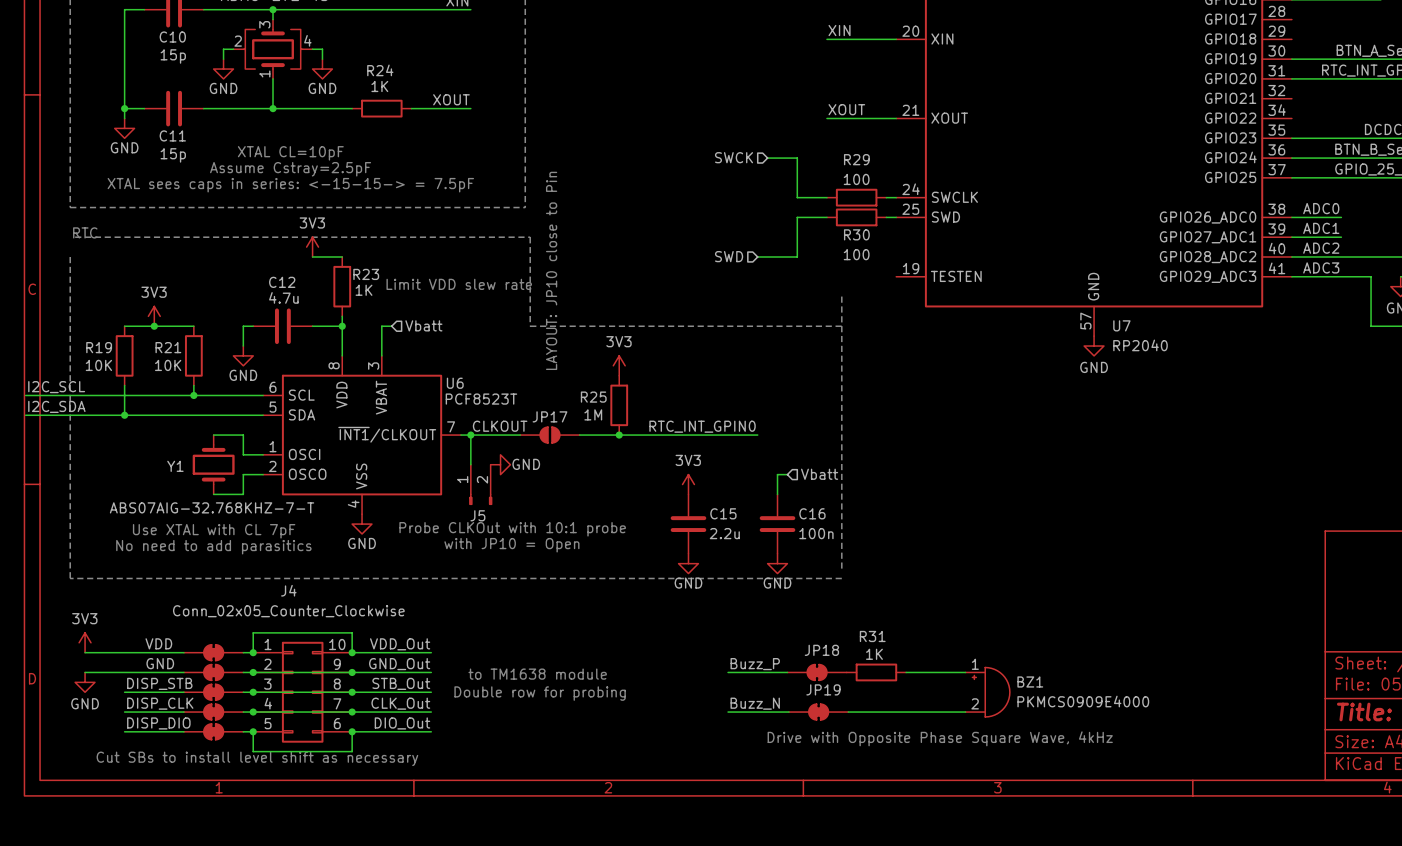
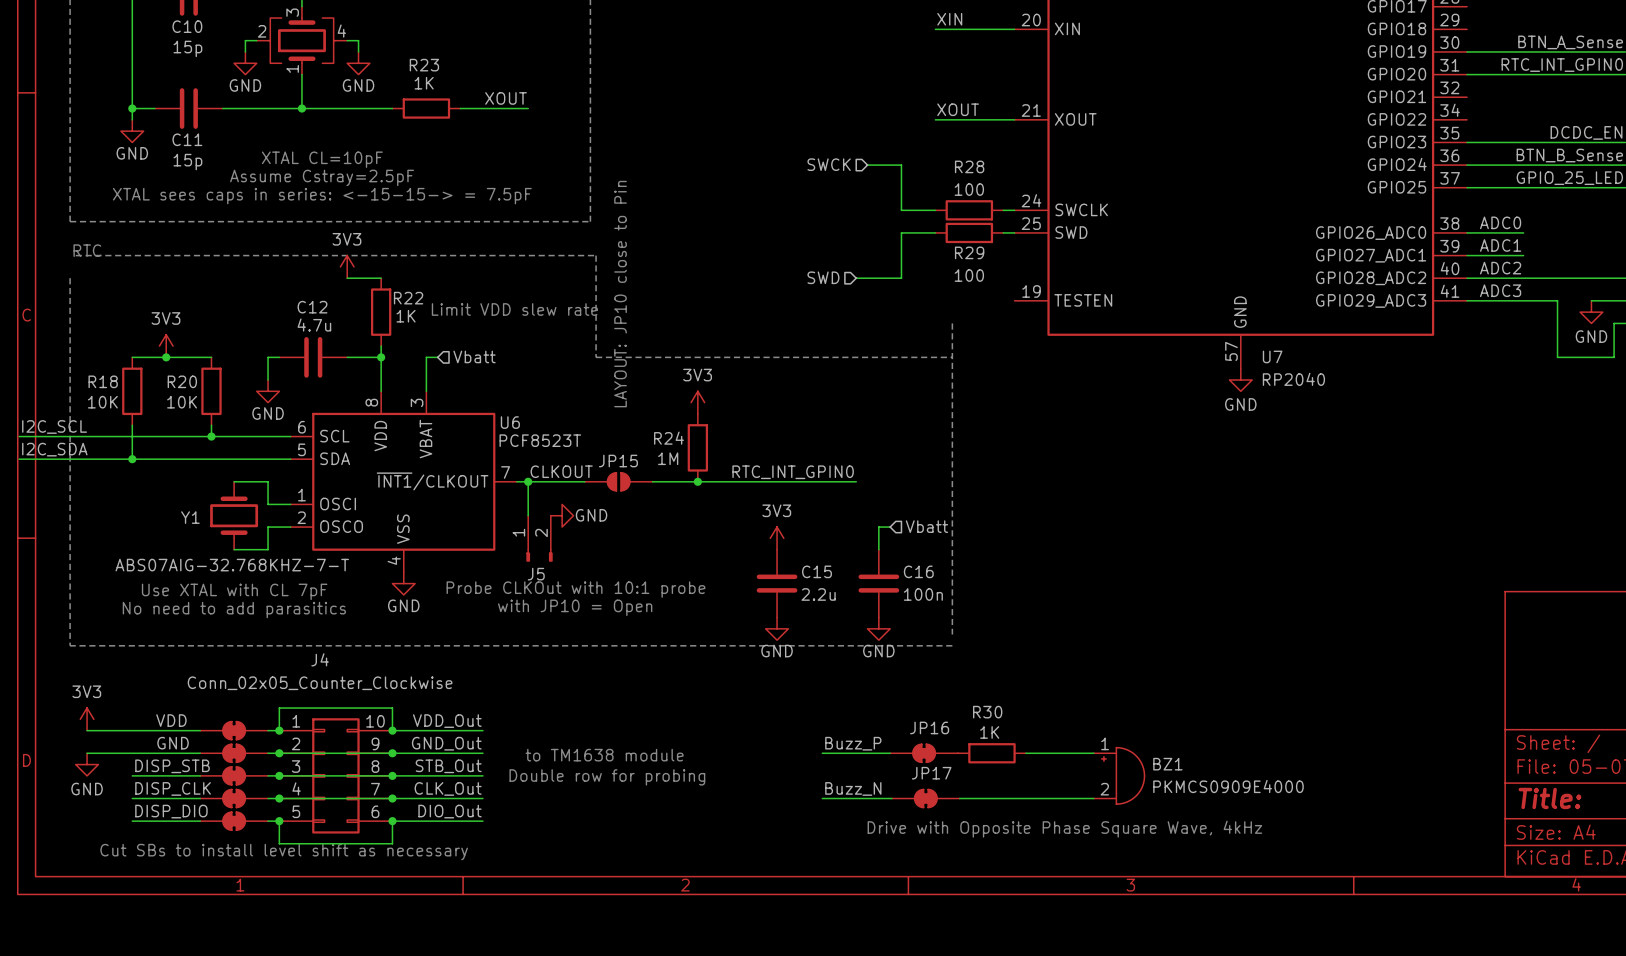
R24 name: R24 (380, 70) -> R23 (424, 65)
R29 name: R29 (856, 159) -> R28 (969, 166)
R30 name: R30 (856, 234) -> R29 (969, 252)
R23 name: R23 (366, 274) -> R22 (408, 298)
R19 name: R19 (99, 347) -> R18 (103, 381)
R21 name: R21 (168, 347) -> R20 (182, 381)
R25 name: R25 (593, 397) -> R24 (668, 438)
JP17 name: JP17 (549, 416) -> JP15 (618, 461)
R31 name: R31 (872, 636) -> R30 (987, 712)
JP18 name: JP18 (821, 650) -> JP16 (929, 727)
JP19 name: JP19 (823, 689) -> JP17 (931, 773)

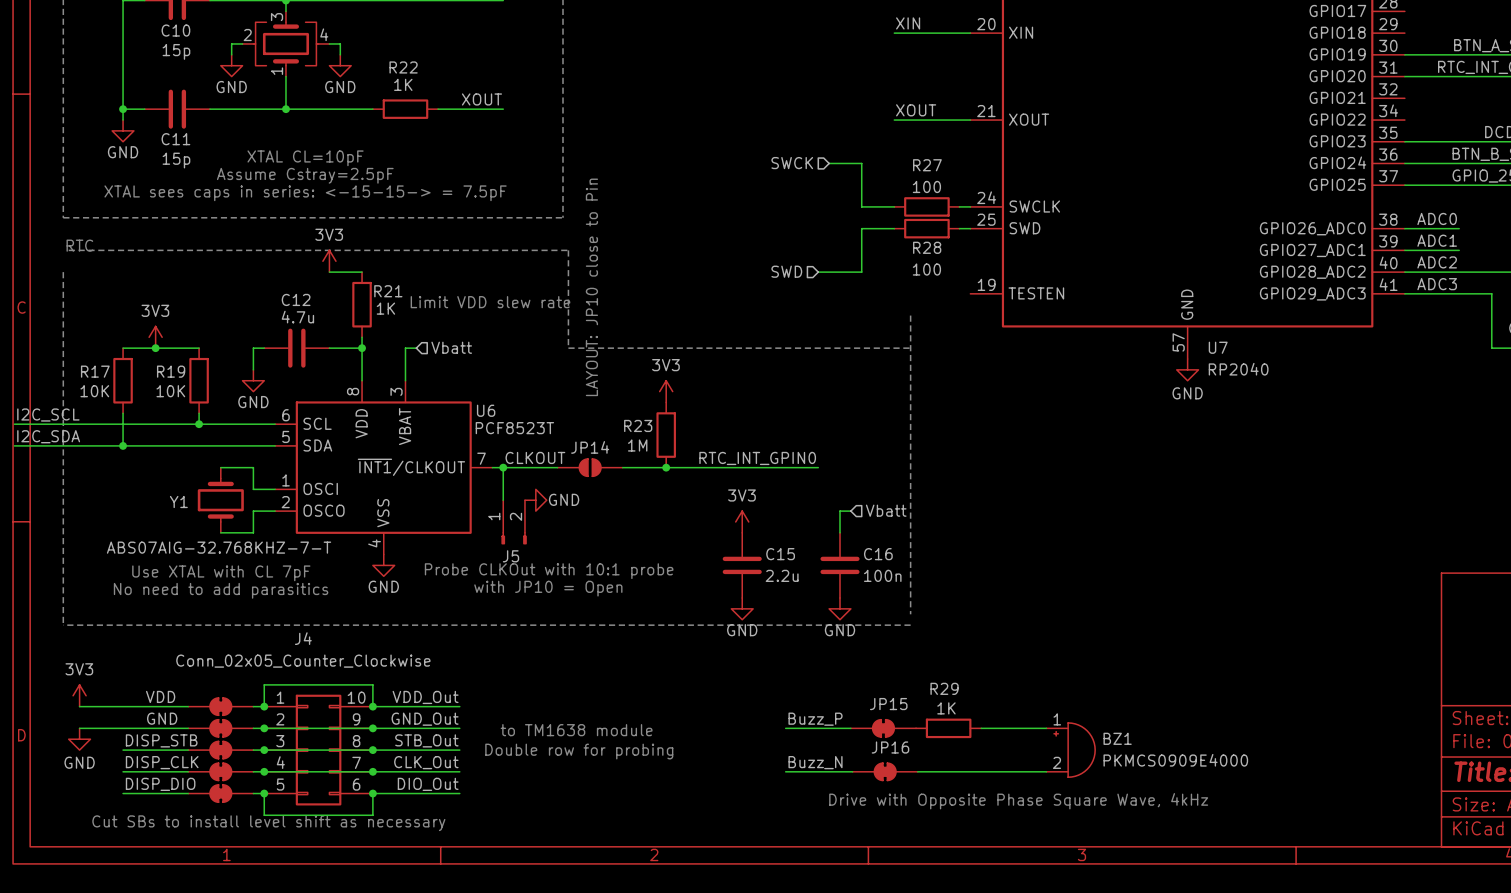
R23 name: R23 (424, 65) -> R22 (403, 67)
R28 name: R28 (969, 166) -> R27 (927, 165)
R29 name: R29 (969, 252) -> R28 (927, 247)
R22 name: R22 (408, 298) -> R21 (388, 291)
R18 name: R18 (103, 381) -> R17 (95, 371)
R20 name: R20 (182, 381) -> R19 (171, 371)
R24 name: R24 (668, 438) -> R23 (638, 425)
JP15 name: JP15 (618, 461) -> JP14 (590, 447)
R30 name: R30 (987, 712) -> R29 (944, 688)
JP16 name: JP16 (929, 727) -> JP15 (888, 704)
JP17 name: JP17 (931, 773) -> JP16 (890, 747)

